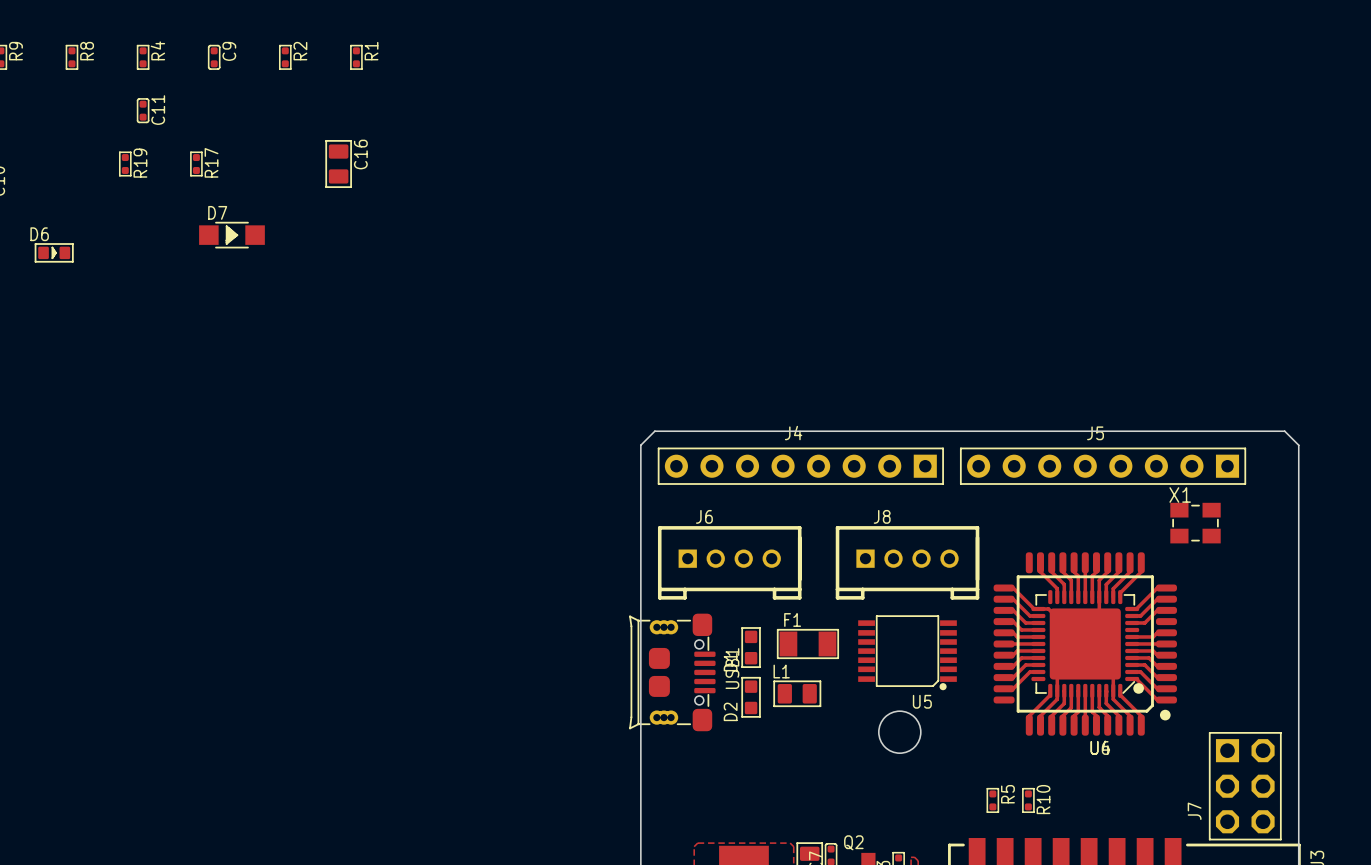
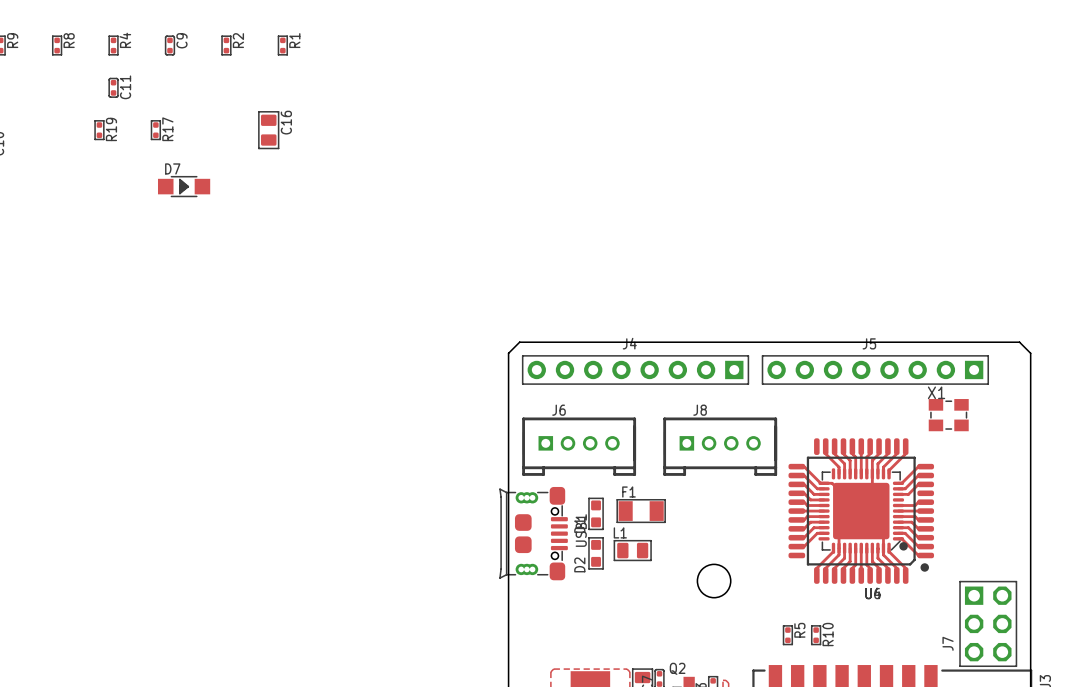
D6: (54, 252) -> none
U5: (907, 652) -> none

